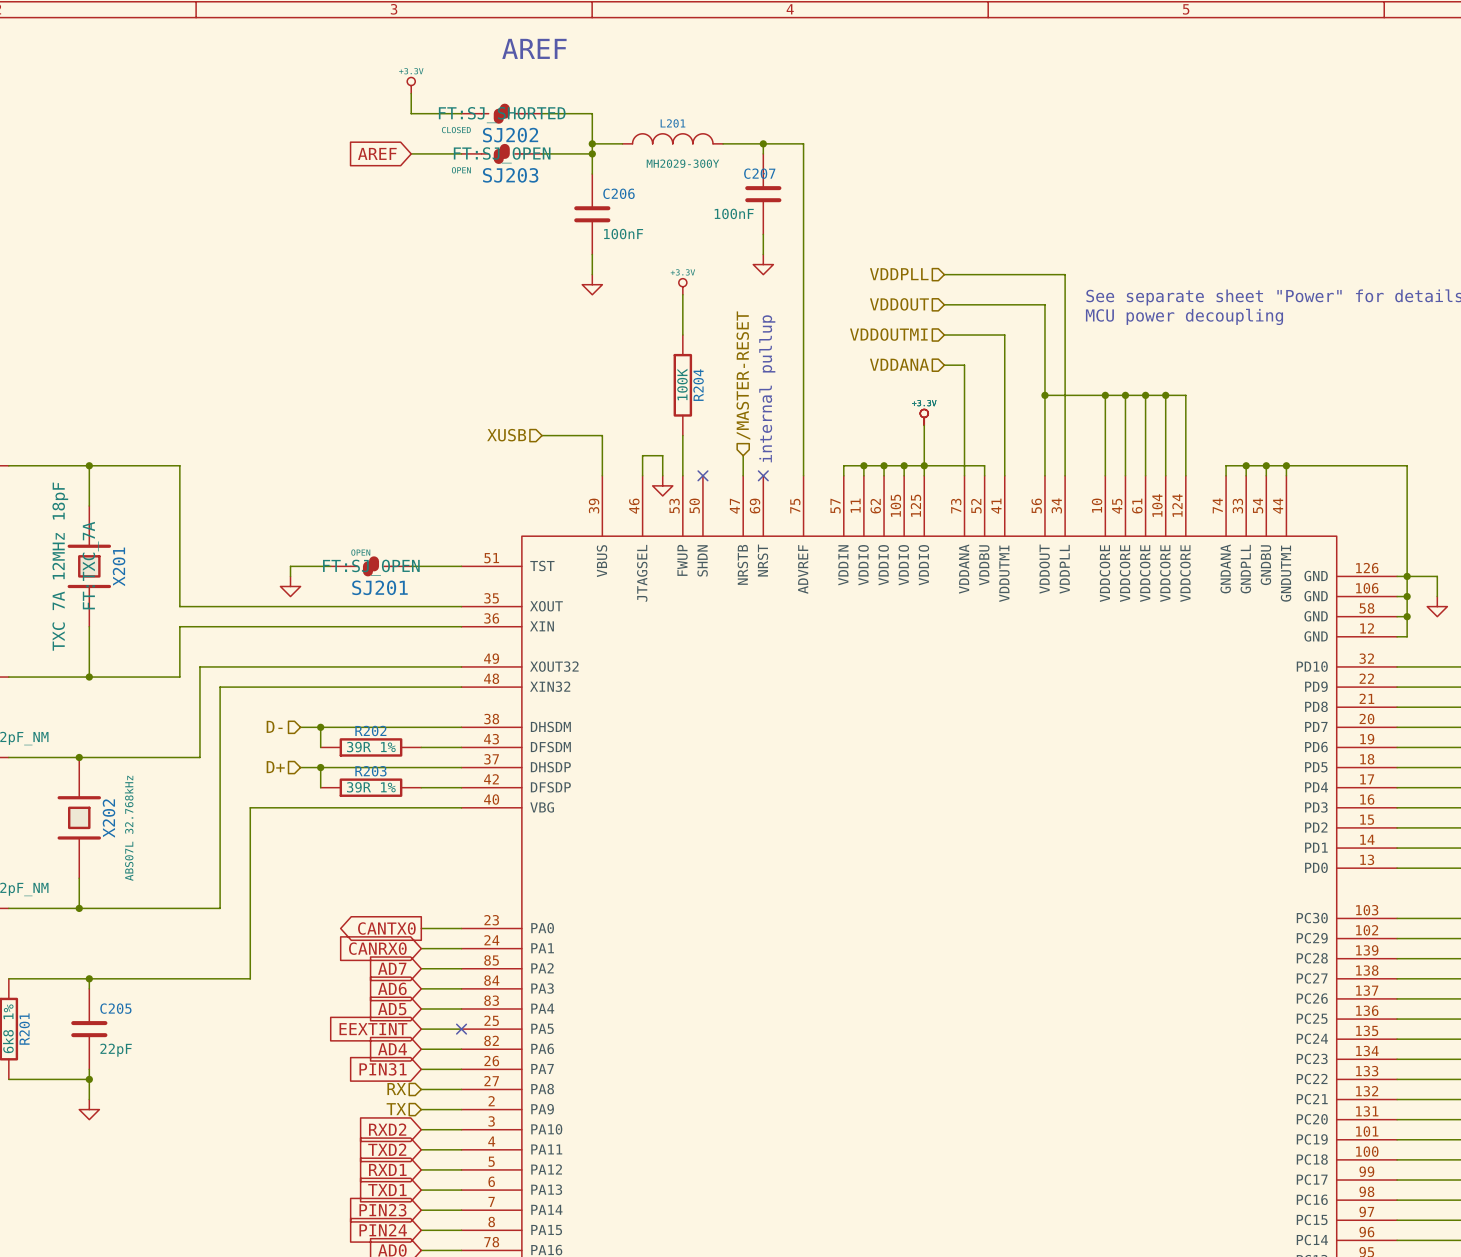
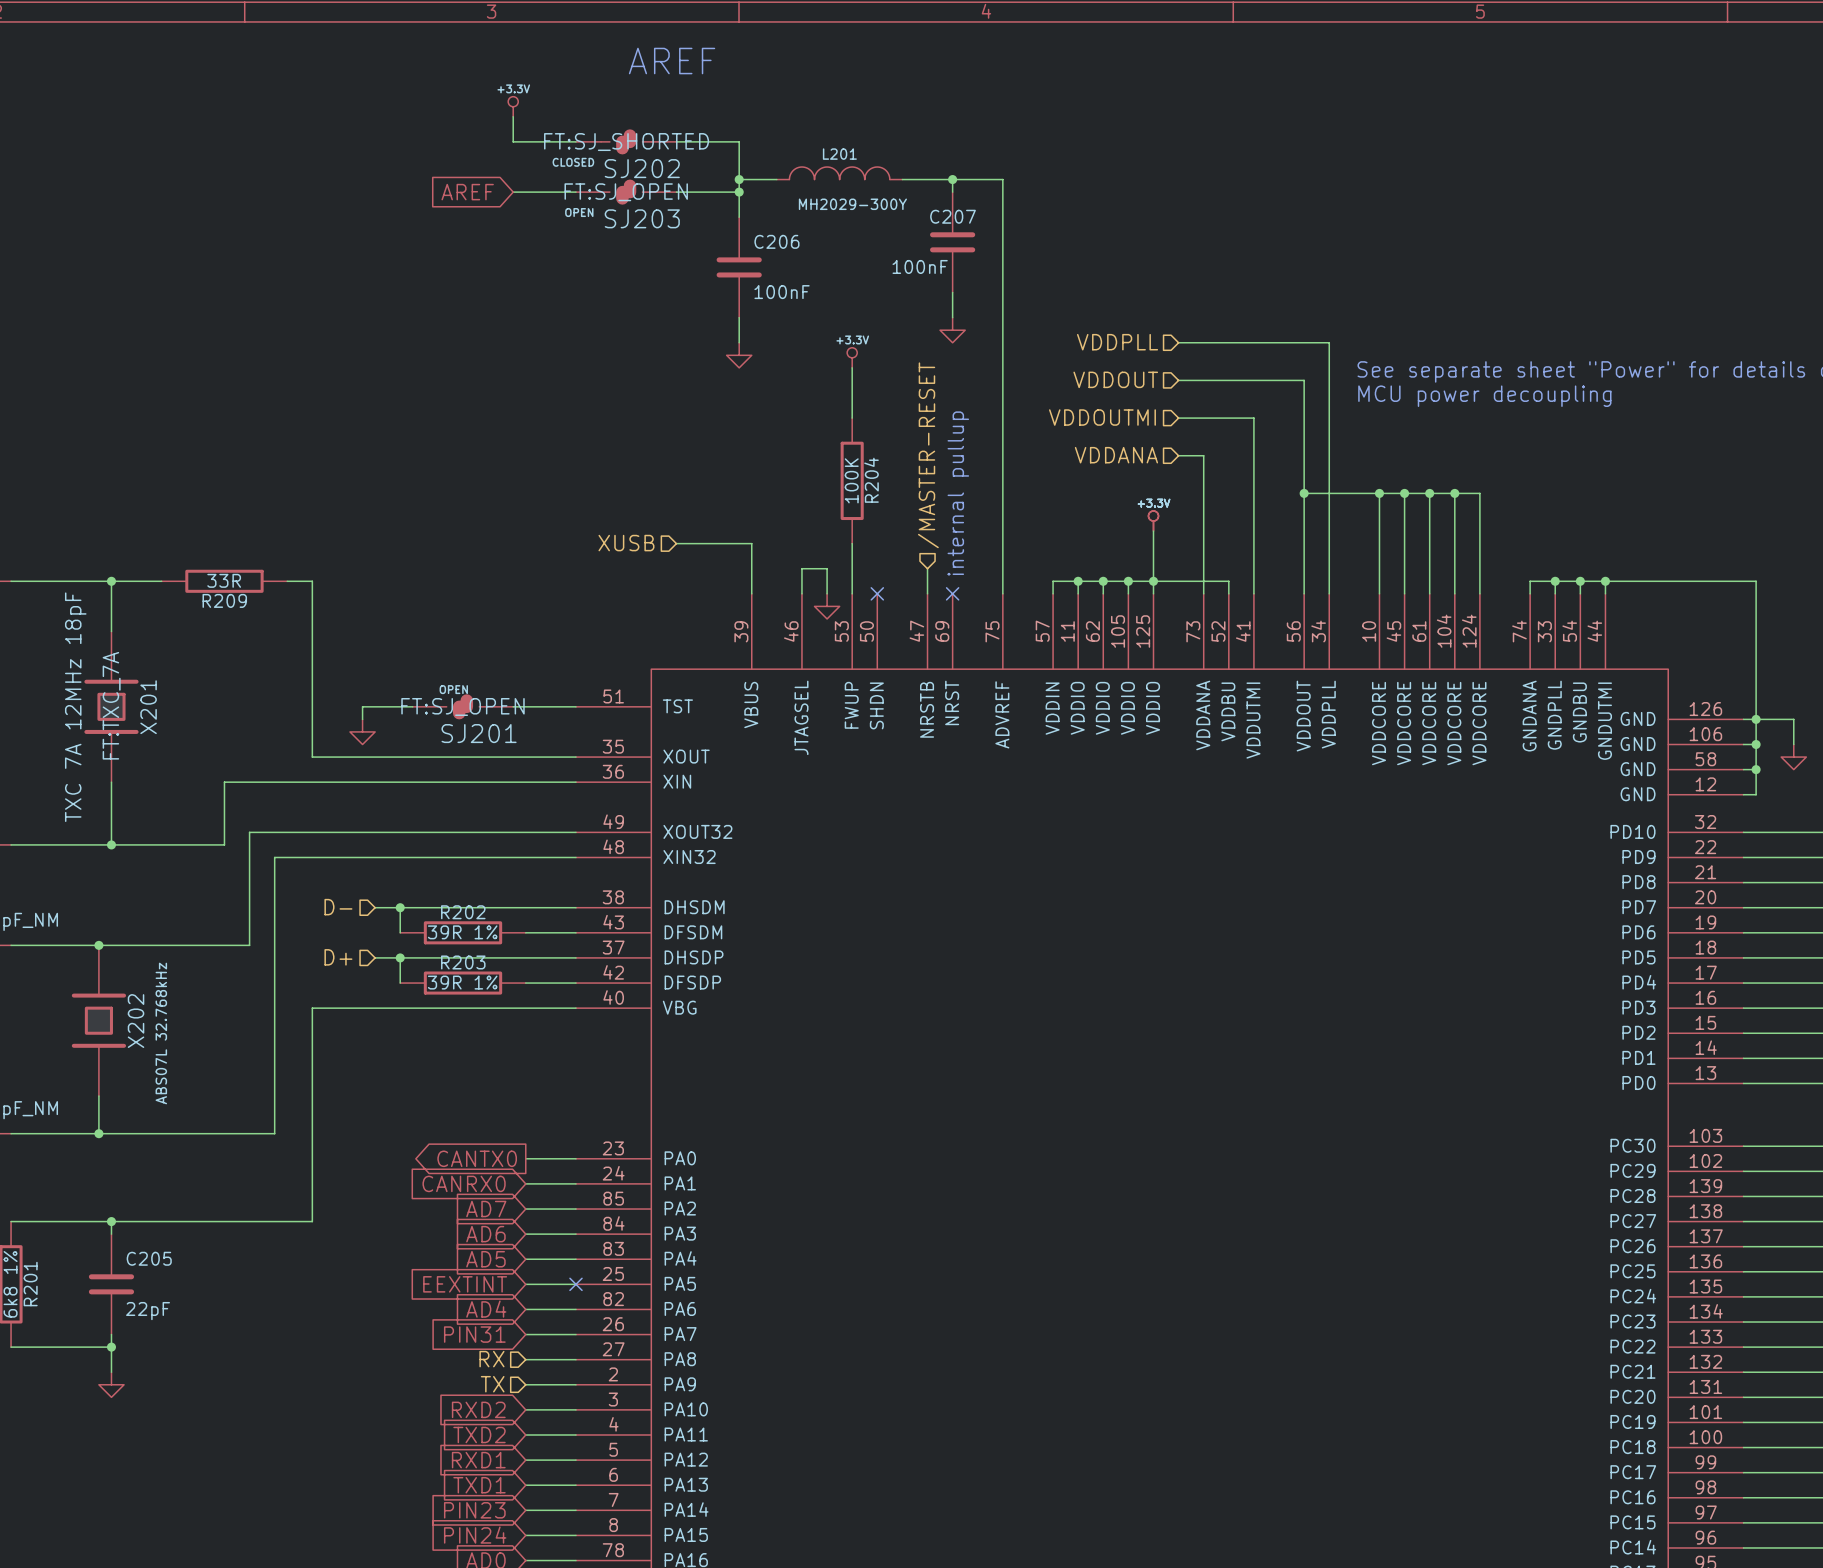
wire: (129, 465) (179, 465) (179, 606) (250, 606) -> (287, 581) (312, 581) (312, 757)
R209: none -> 33R (224, 581)

